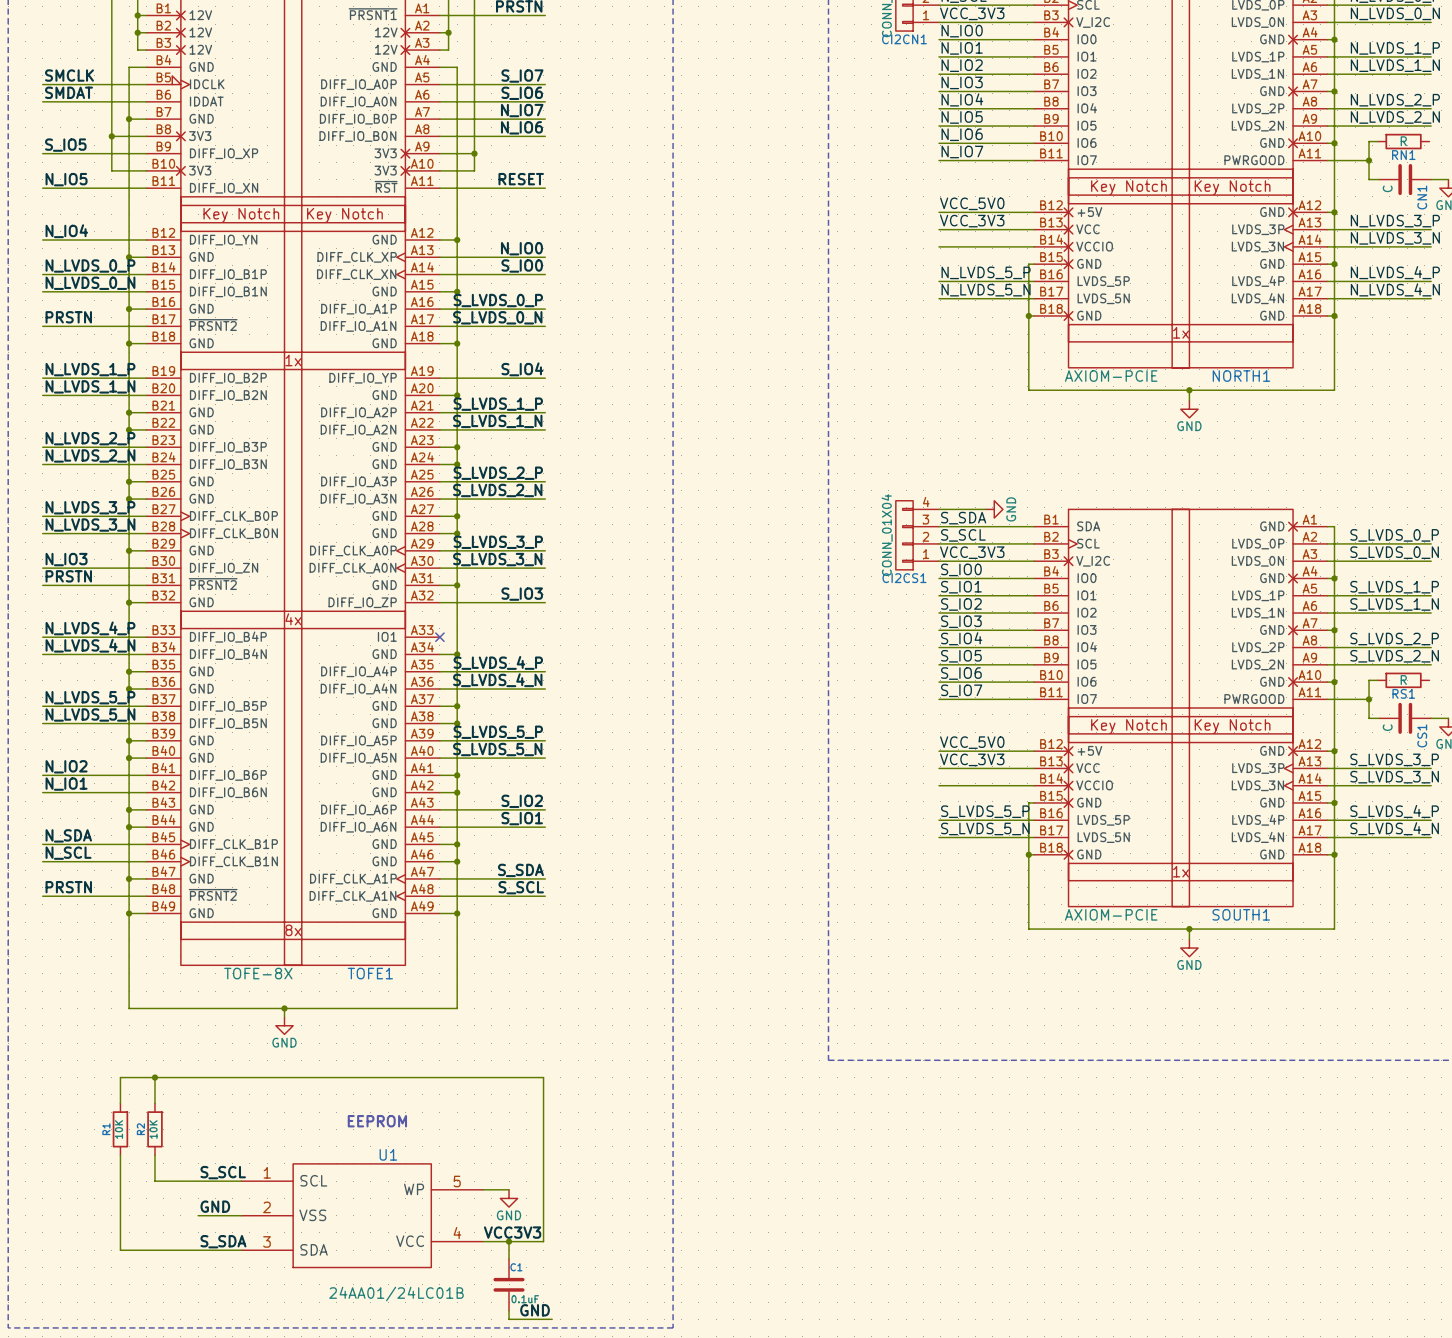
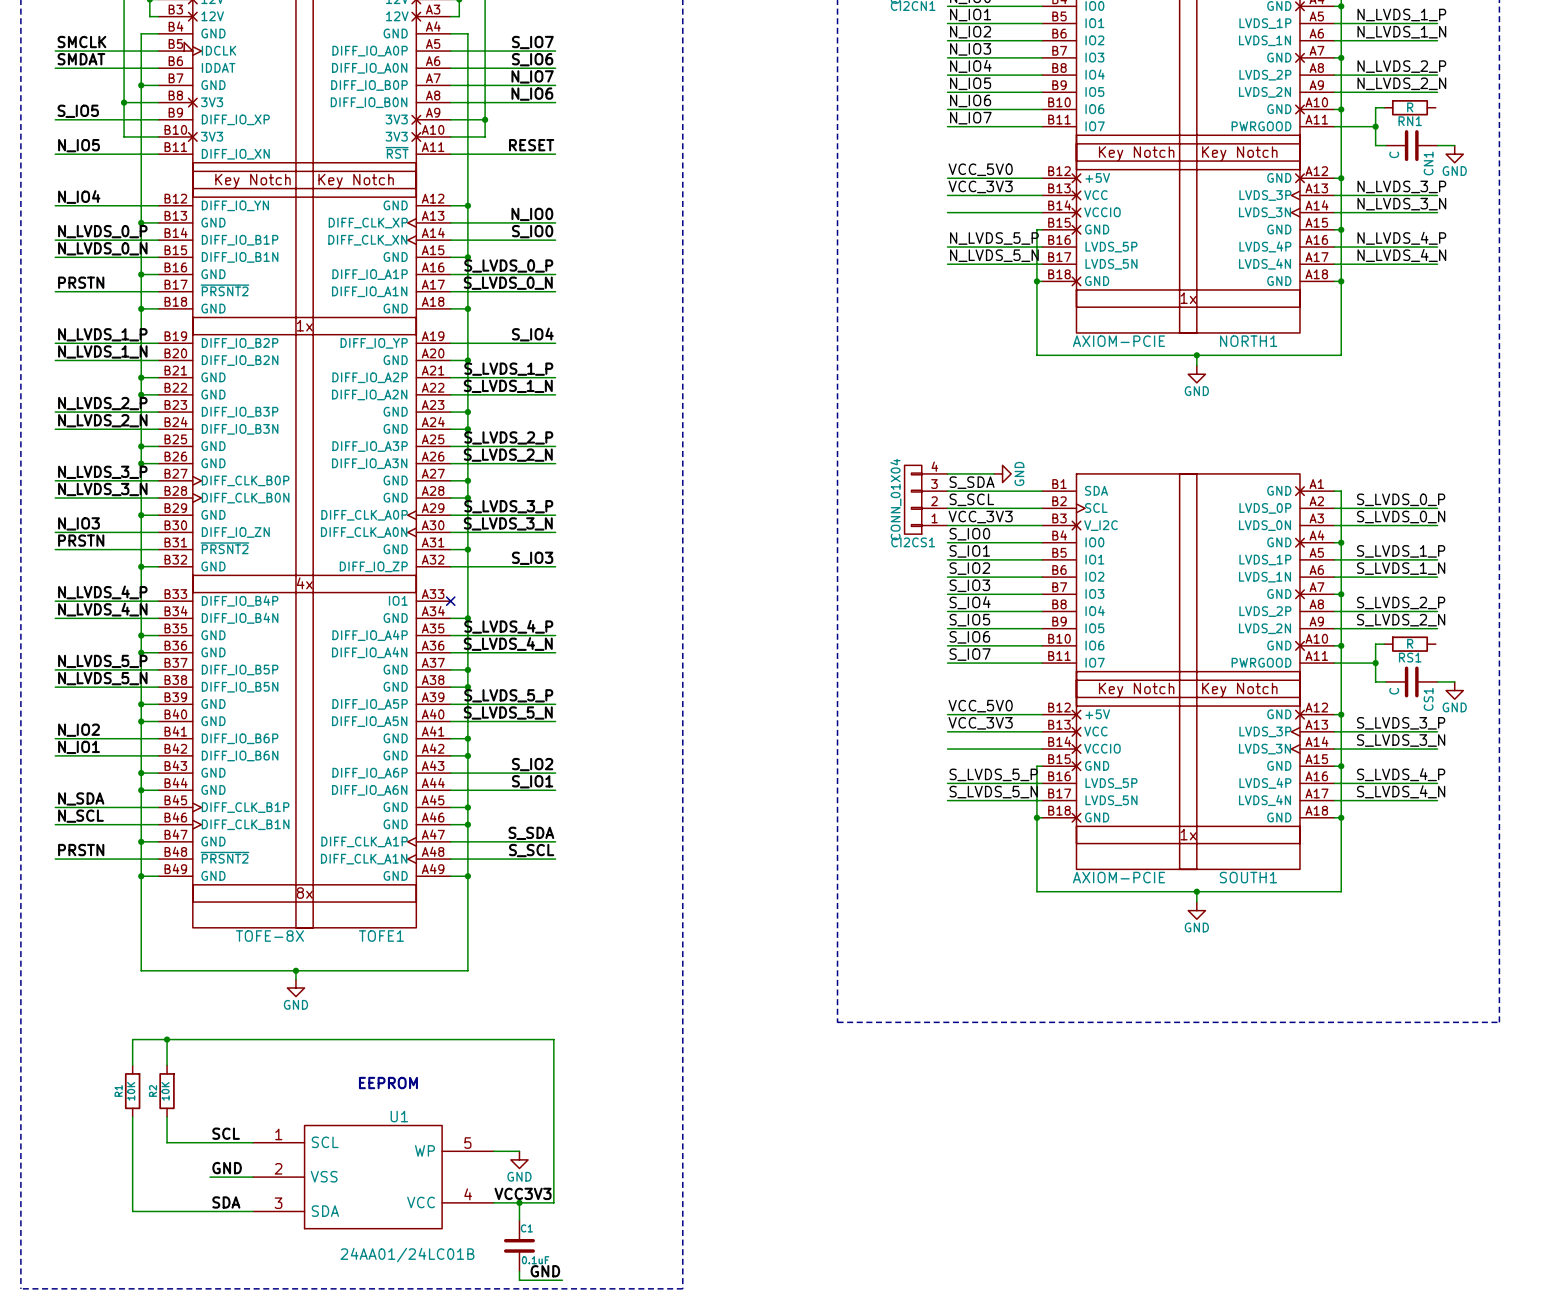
label: S_SCL (223, 1172) -> SCL (226, 1133)
label: S_SDA (223, 1241) -> SDA (226, 1202)

